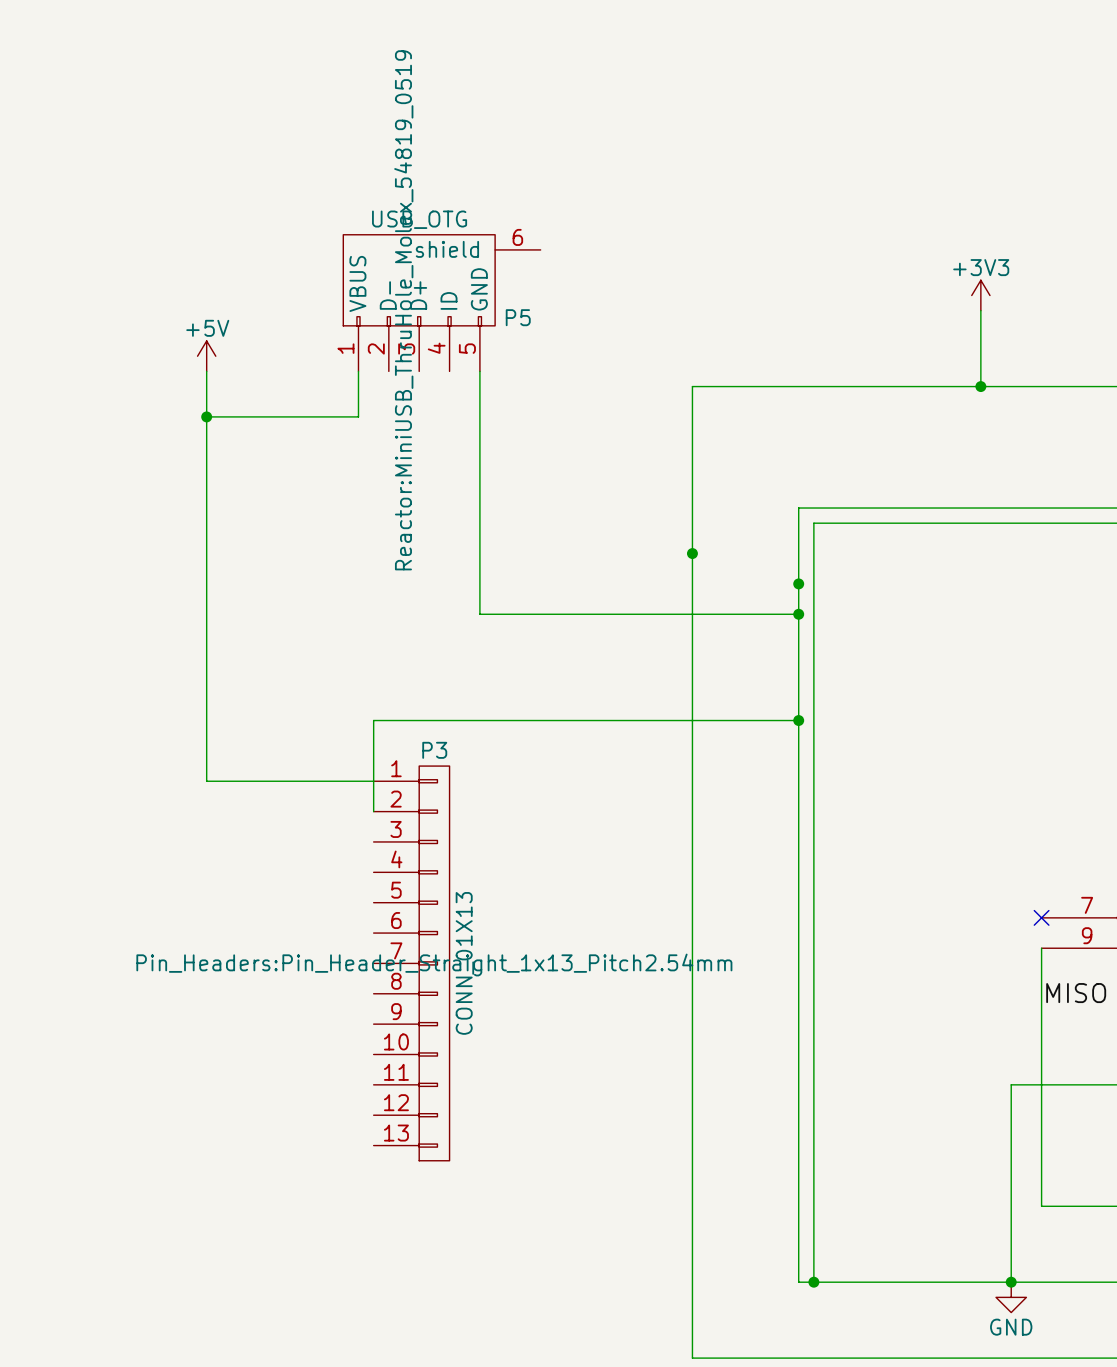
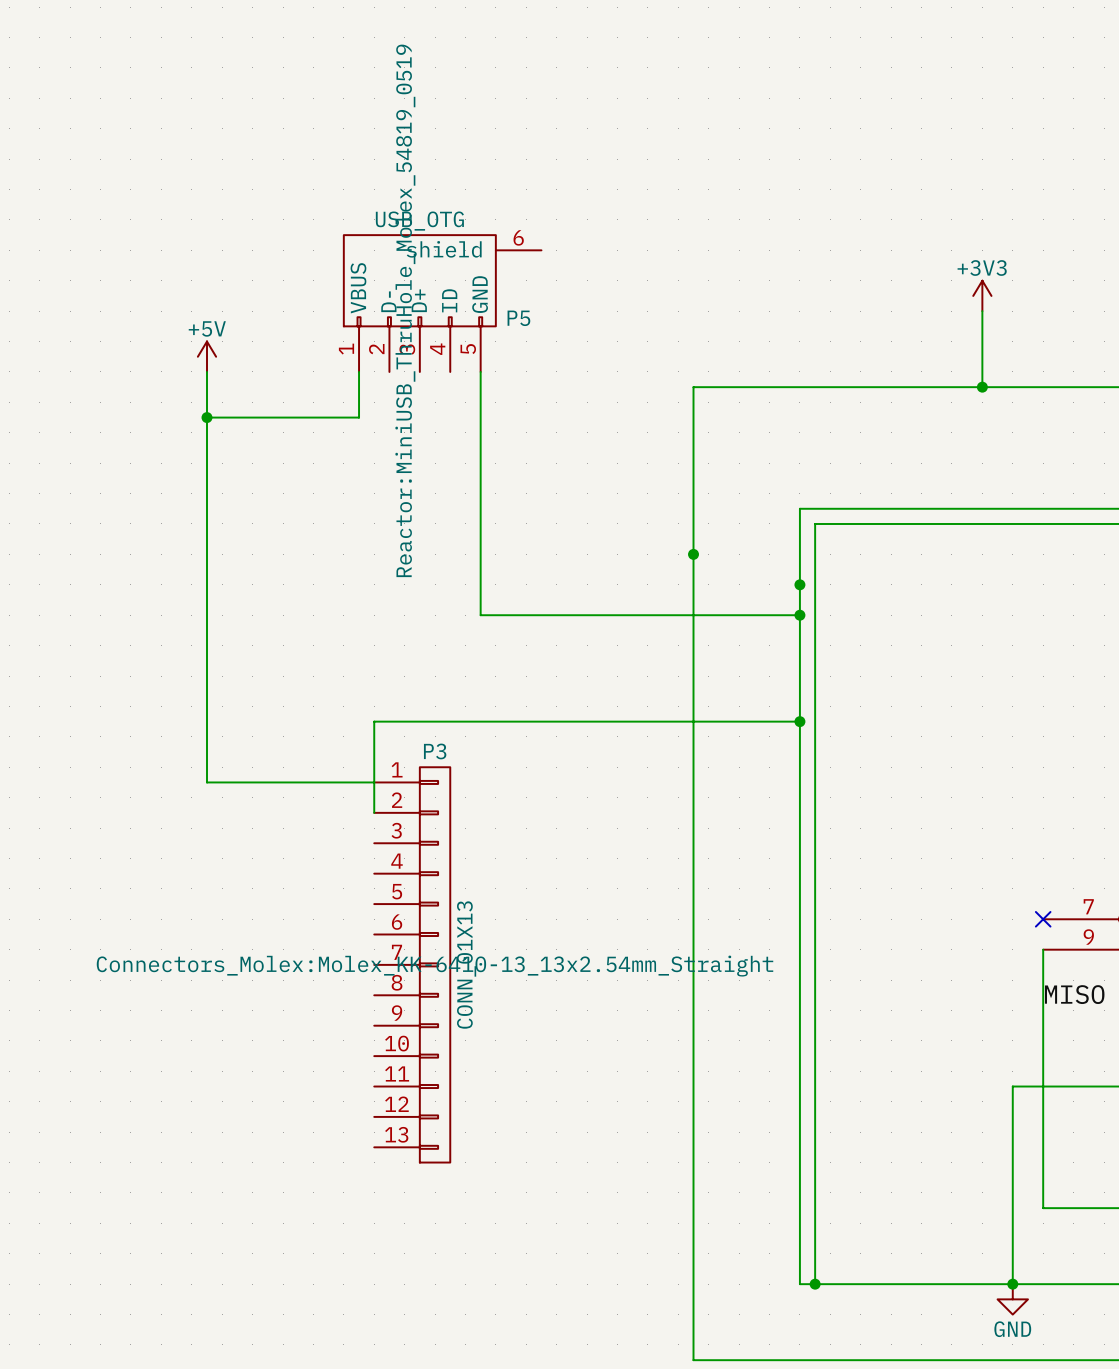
P3 text: Pin_Headers:Pin_Header_Straight_1x13_Pitch2.54mm (434, 965) -> Connectors_Molex:Molex_KK-6410-13_13x2.54mm_Straight (435, 966)

